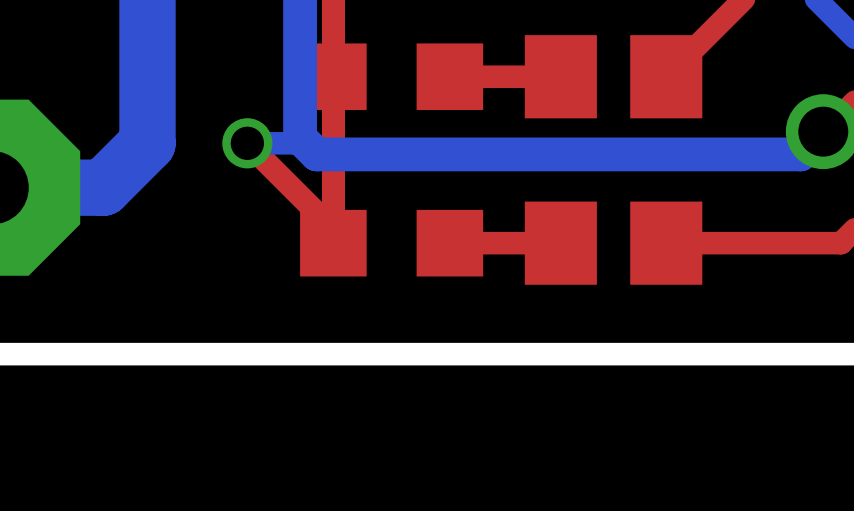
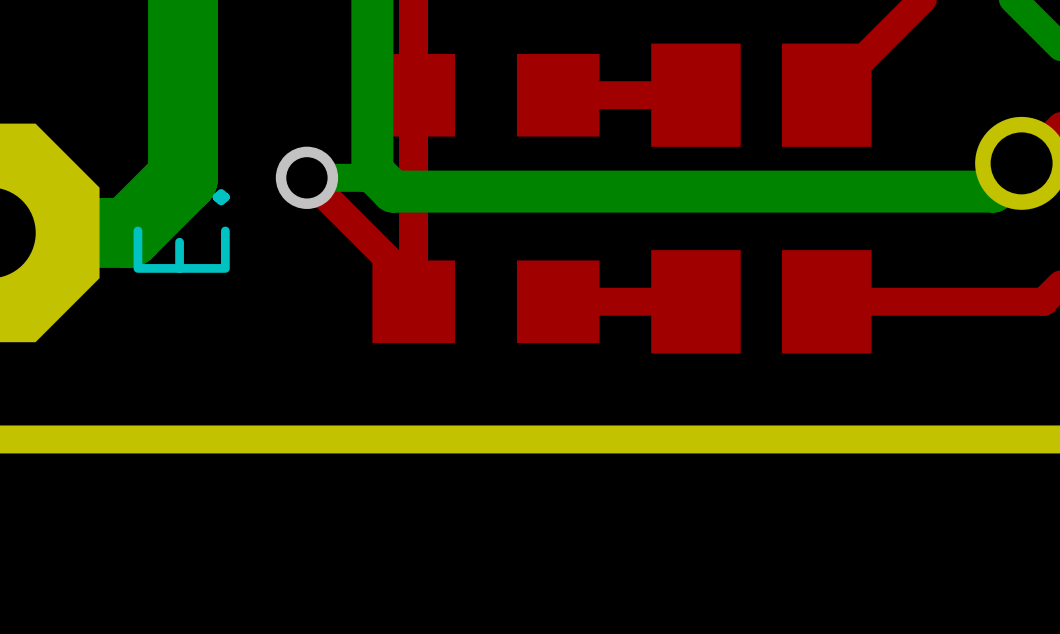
E. name: none -> E. (181, 230)

